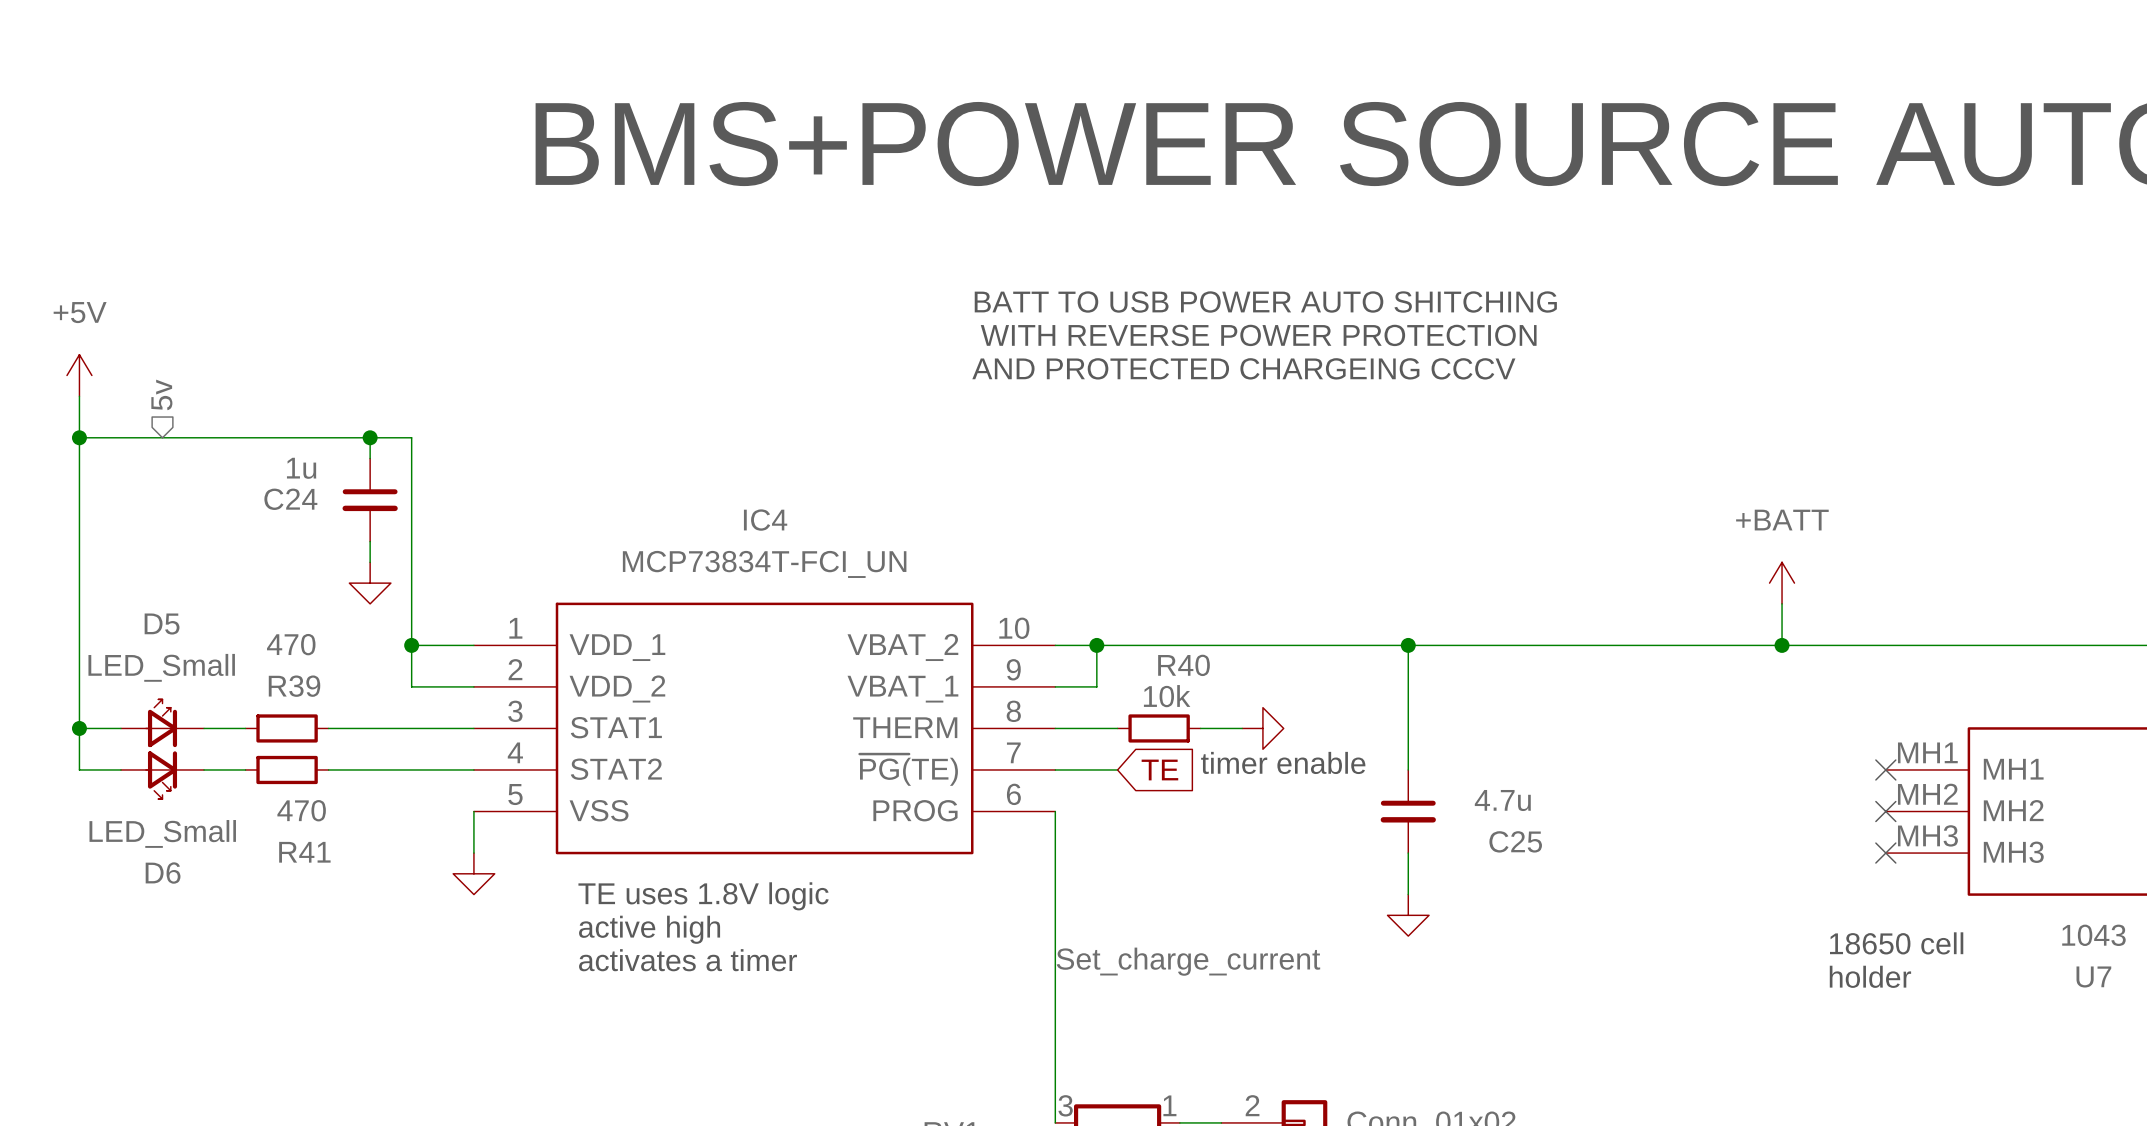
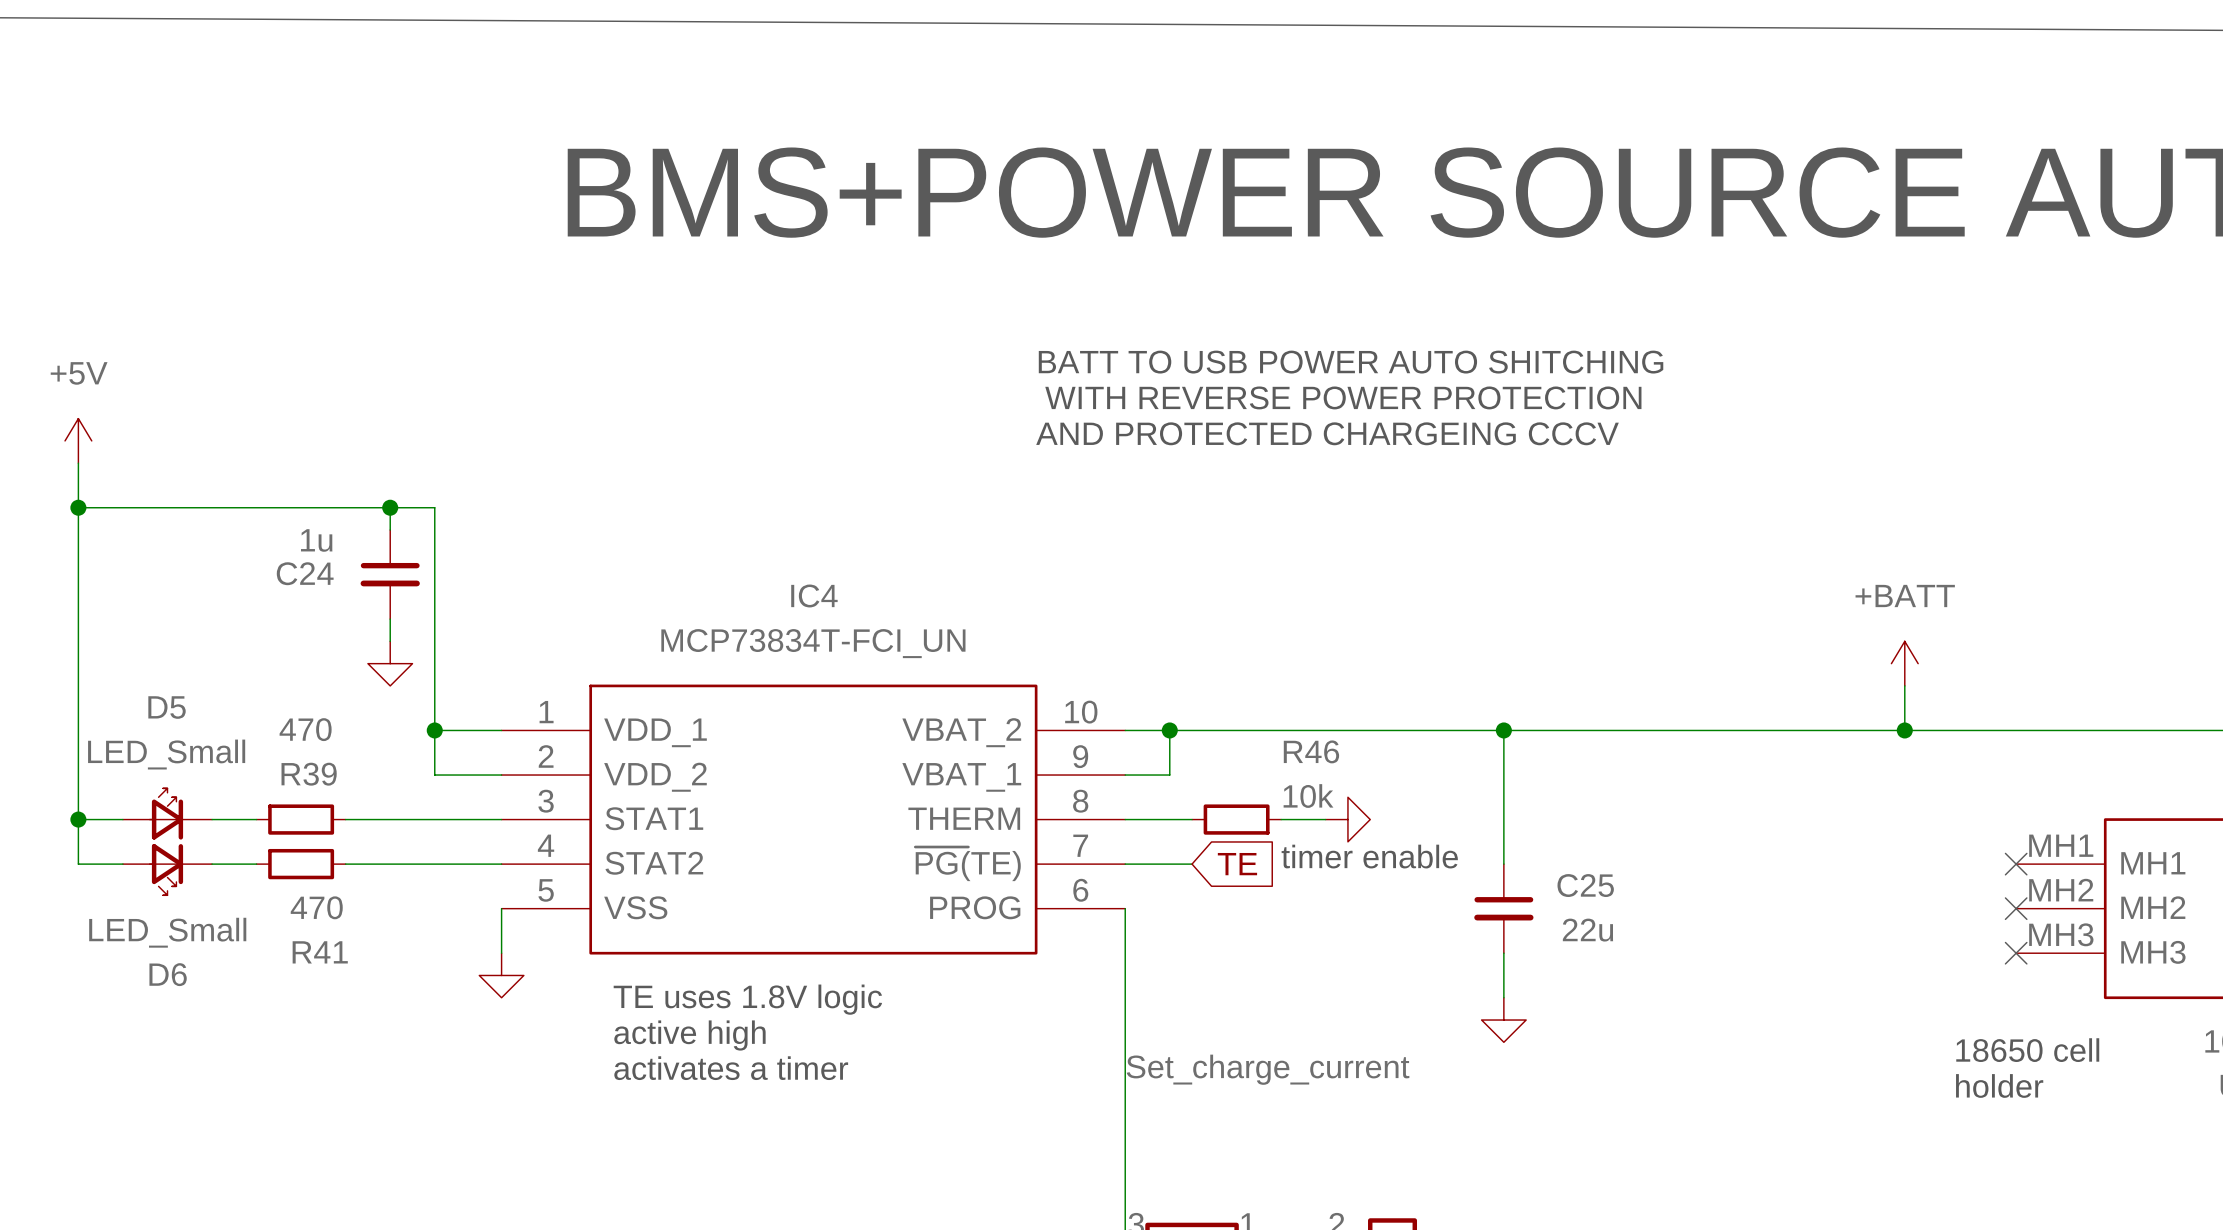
hierarchical label: 5v (161, 394) -> none
R40 name: R40 (1184, 665) -> R46 (1311, 751)
R40 value position: 10k (1167, 696) -> 10k (1308, 796)
C25 value: 4.7u (1502, 800) -> 22u (1587, 930)
C25 name position: C25 (1515, 841) -> C25 (1585, 885)

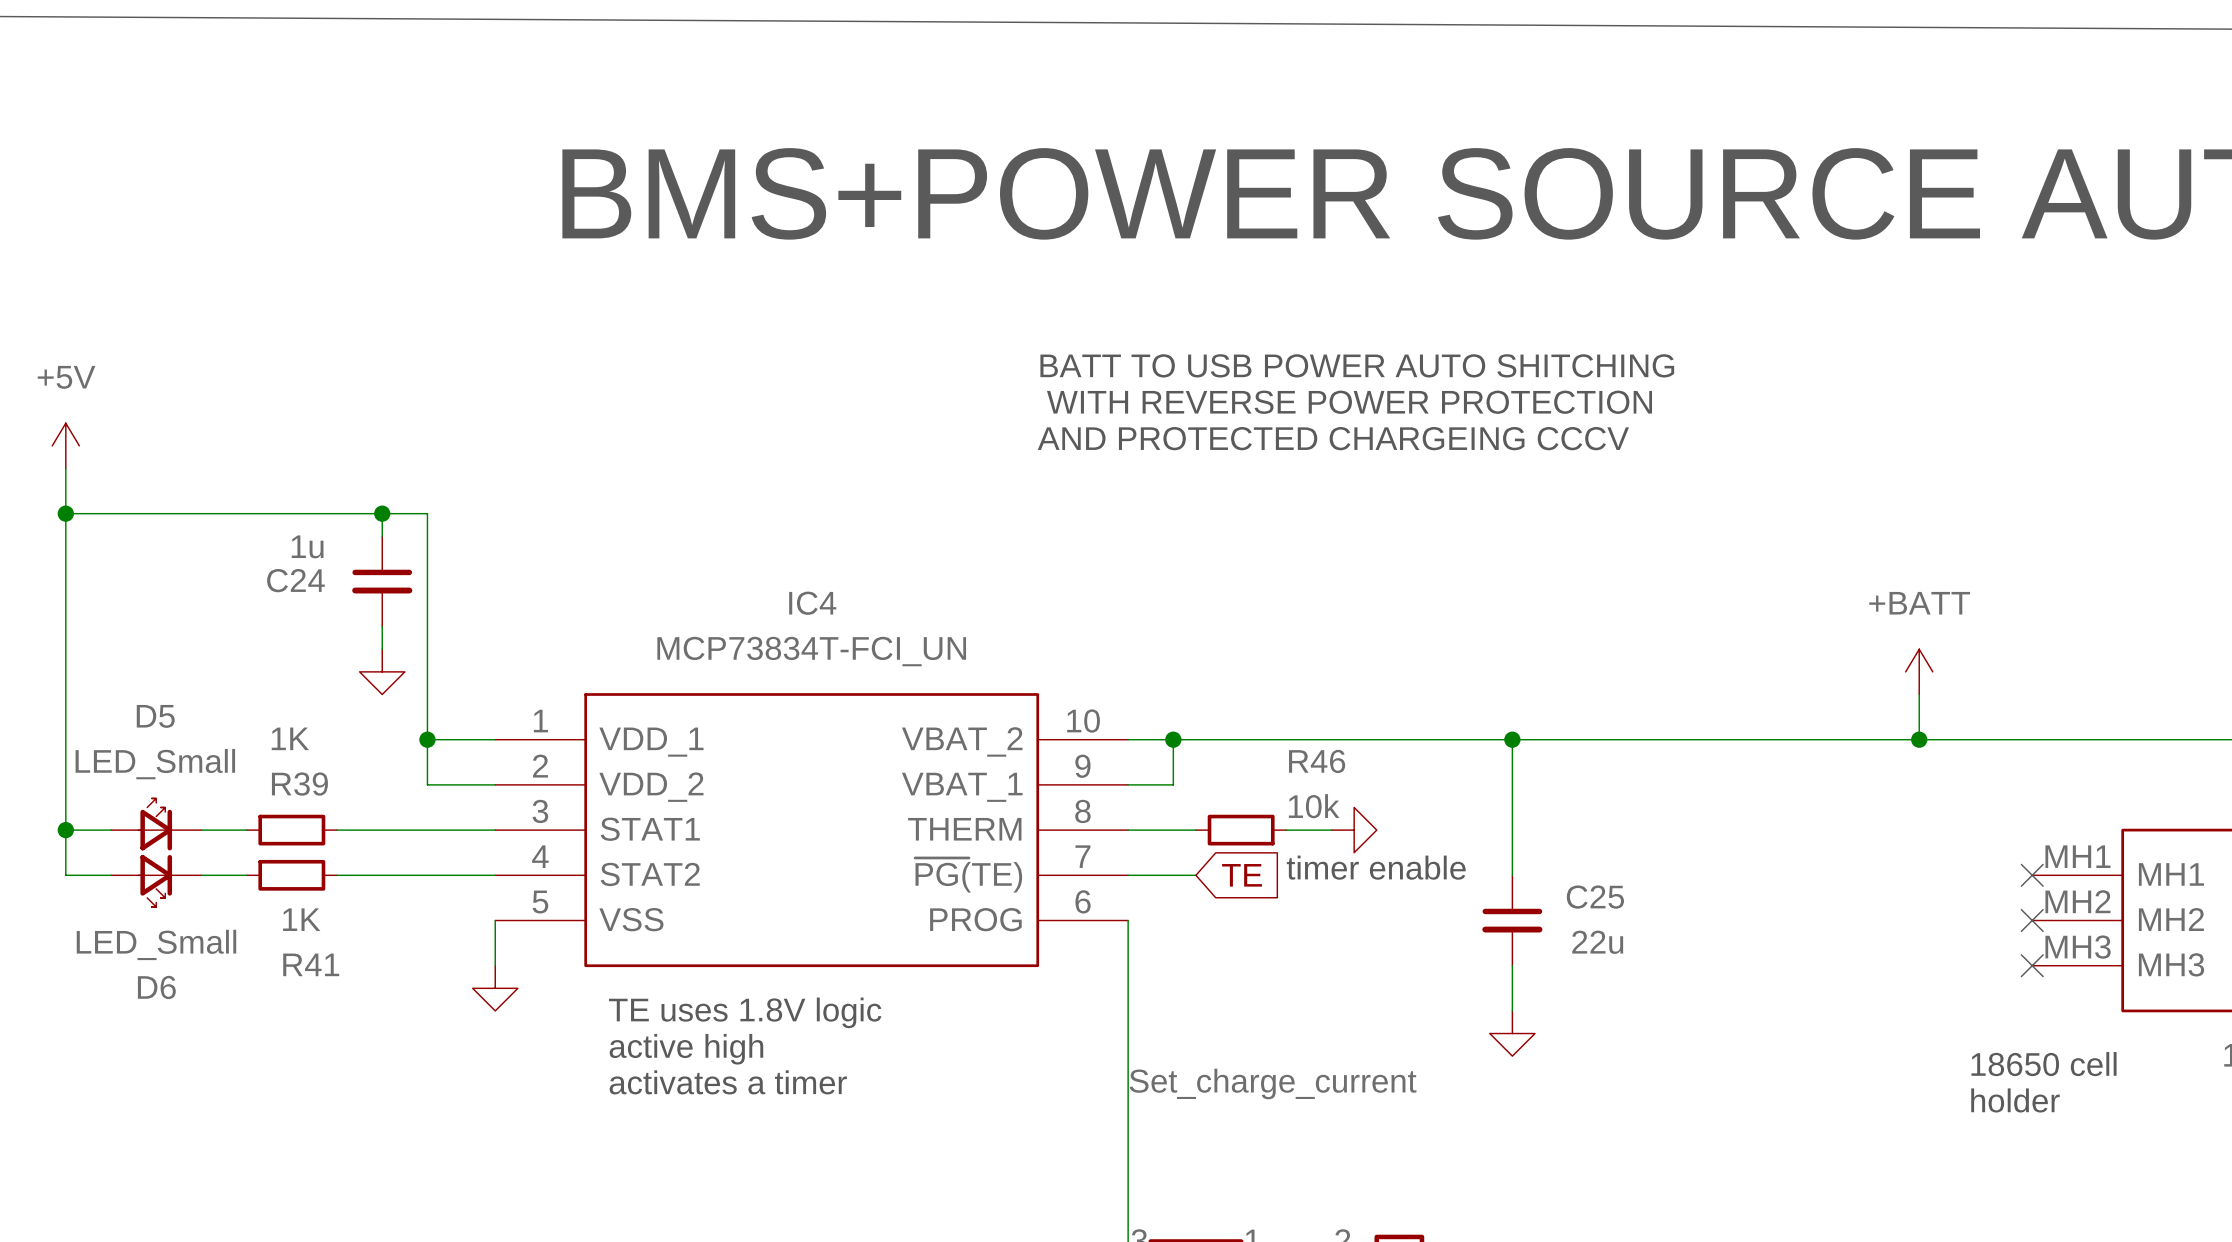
R39 value: 470 (305, 729) -> 1K (290, 738)
R41 value: 470 (316, 907) -> 1K (301, 919)

